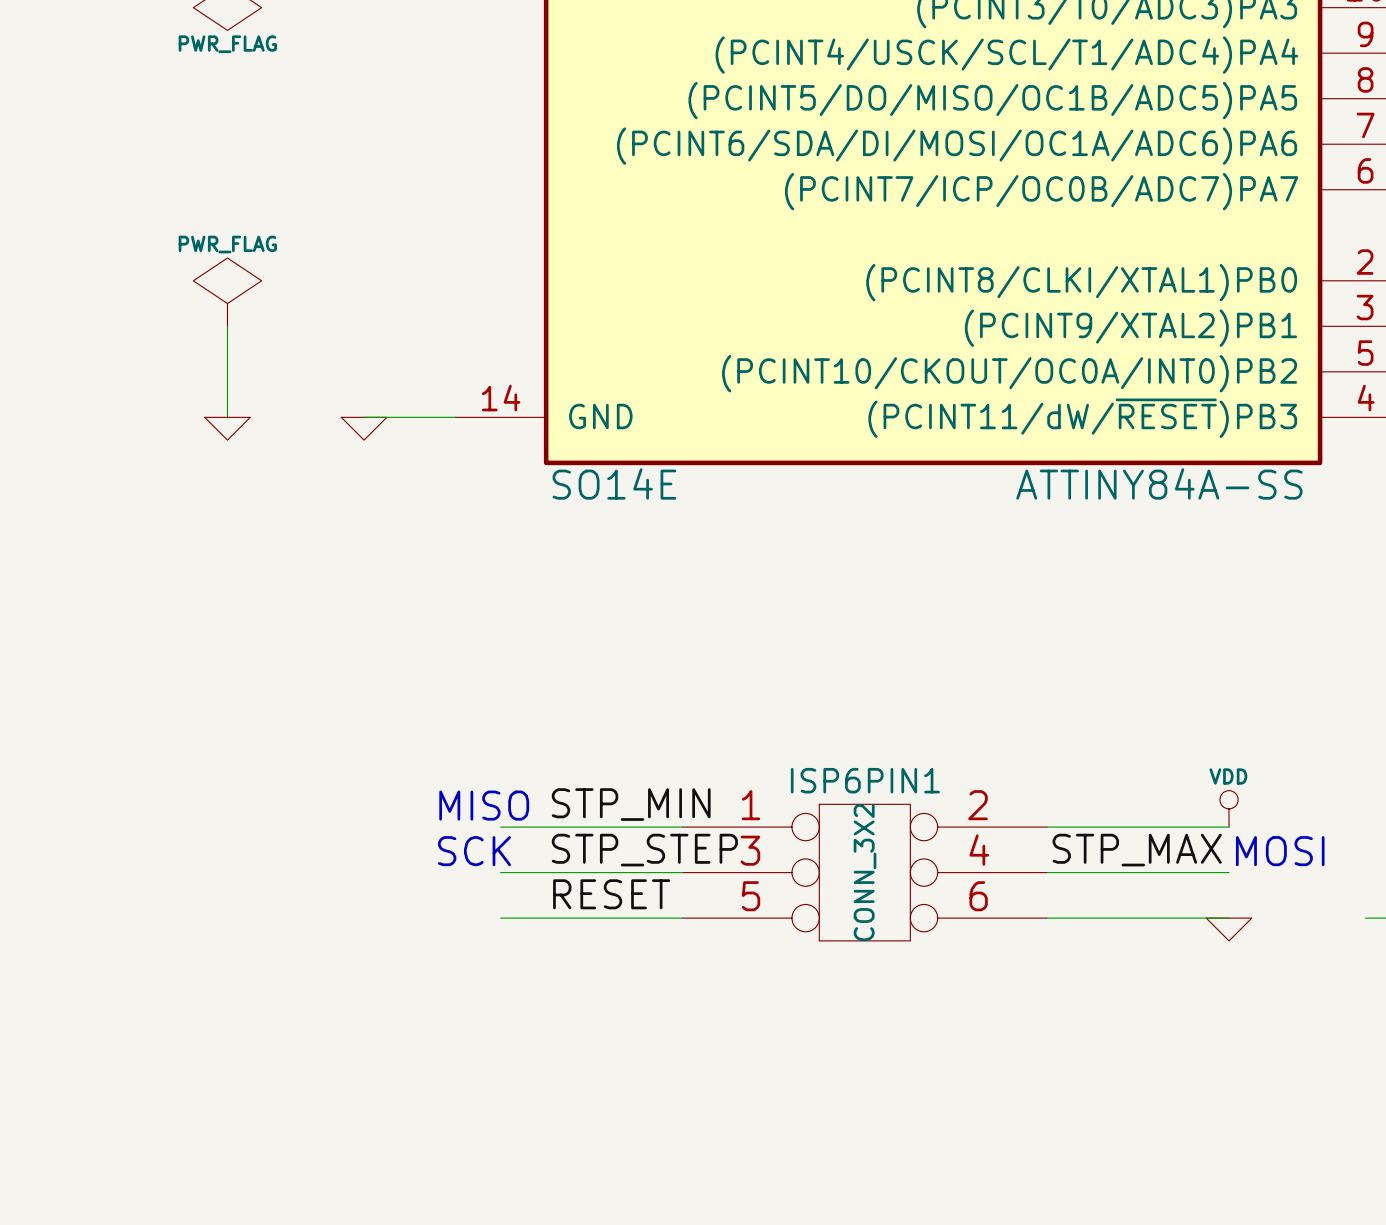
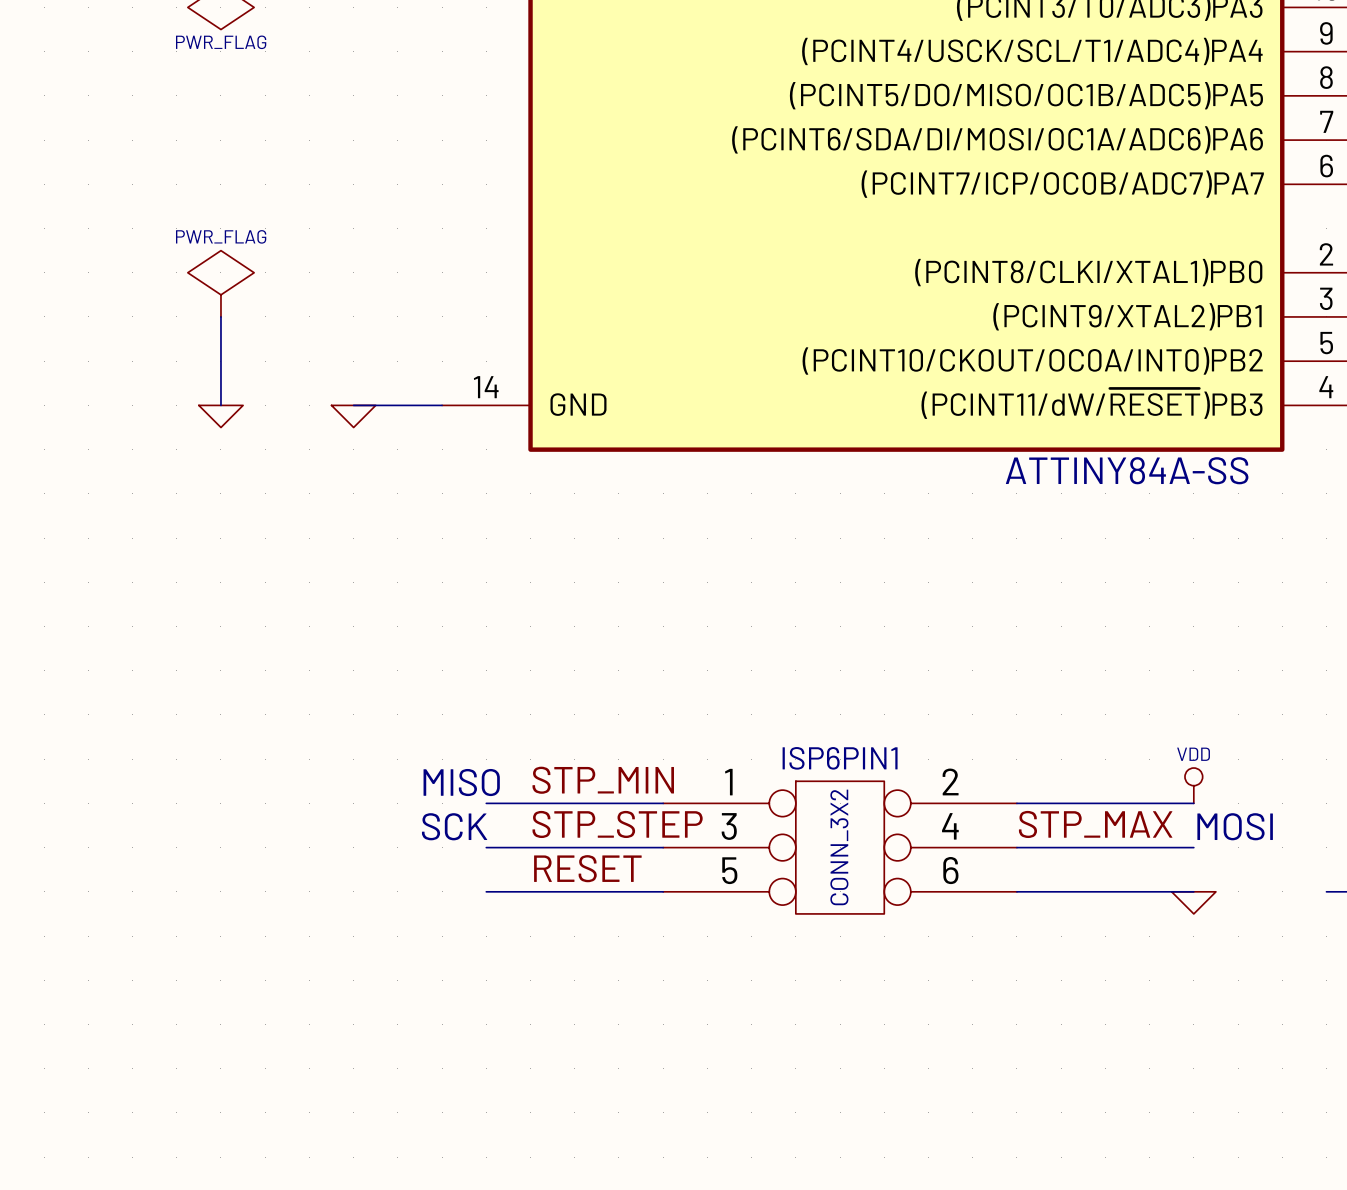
part text: SO14E (614, 483) -> none

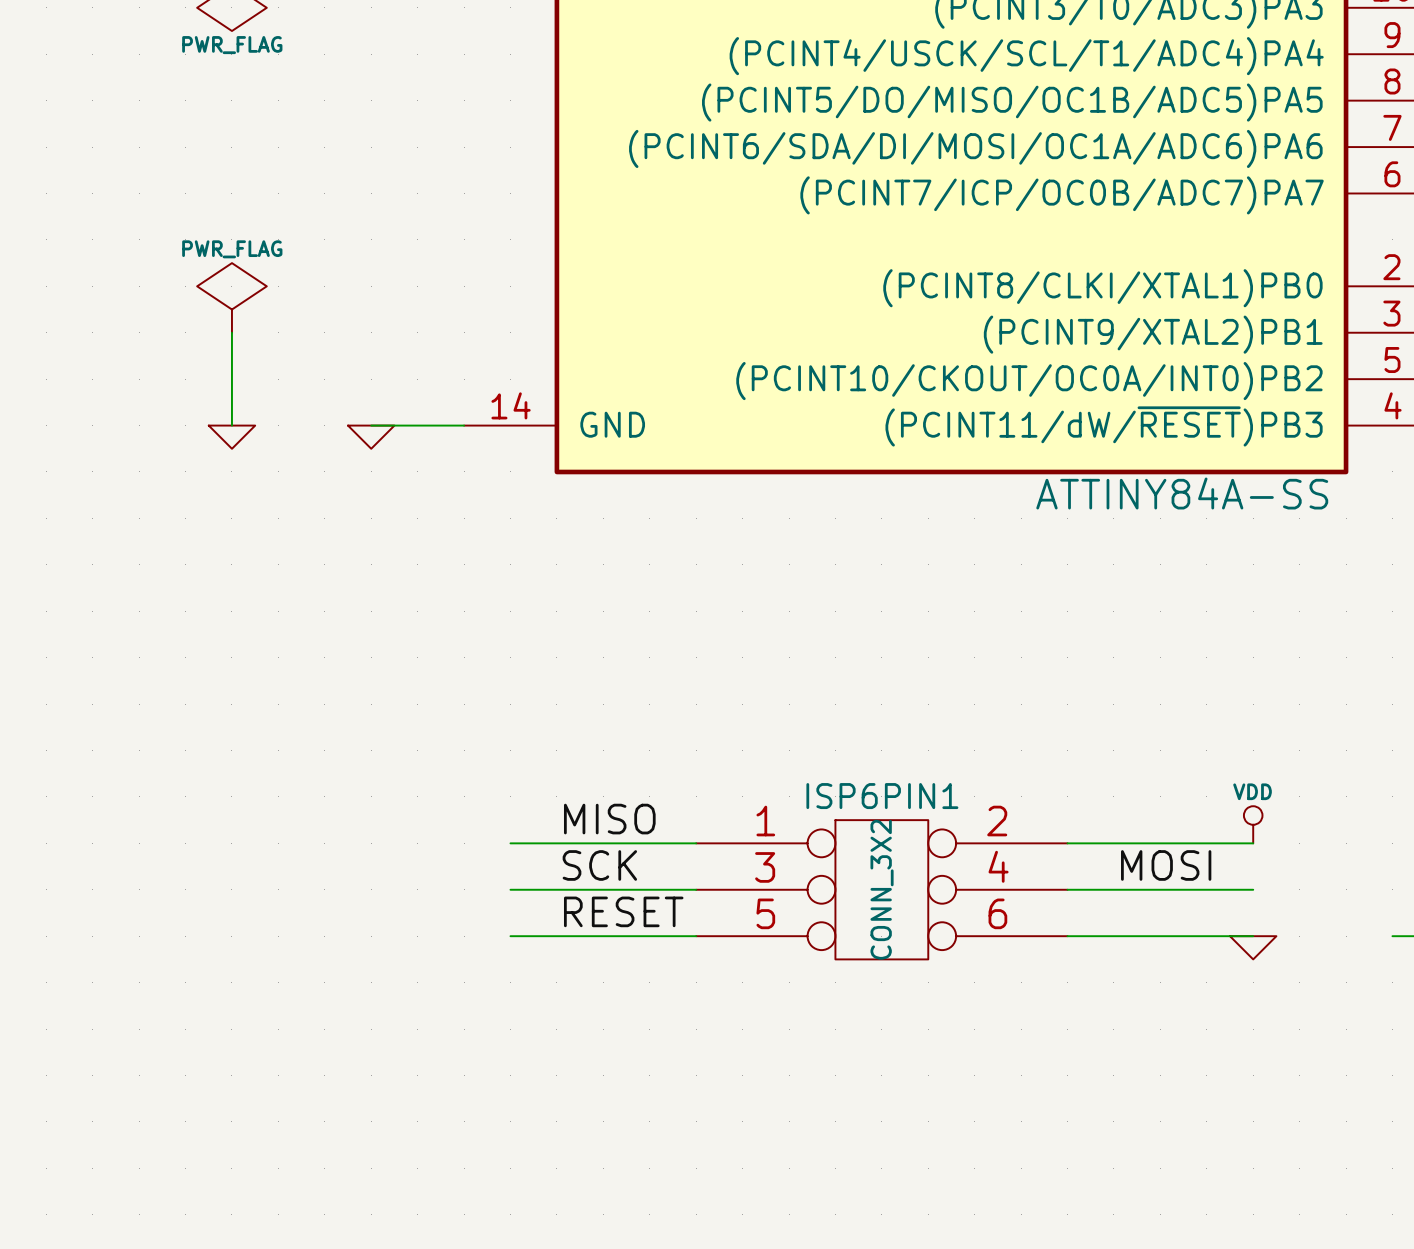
label: STP_MIN (603, 780) -> MISO (609, 819)
text: MISO (461, 782) -> none
label: STP_STEP (617, 824) -> SCK (599, 865)
label: STP_MAX (1095, 824) -> none
label: none -> MOSI (1166, 865)
text: SCK (454, 826) -> none
text: MOSI (1235, 826) -> none

